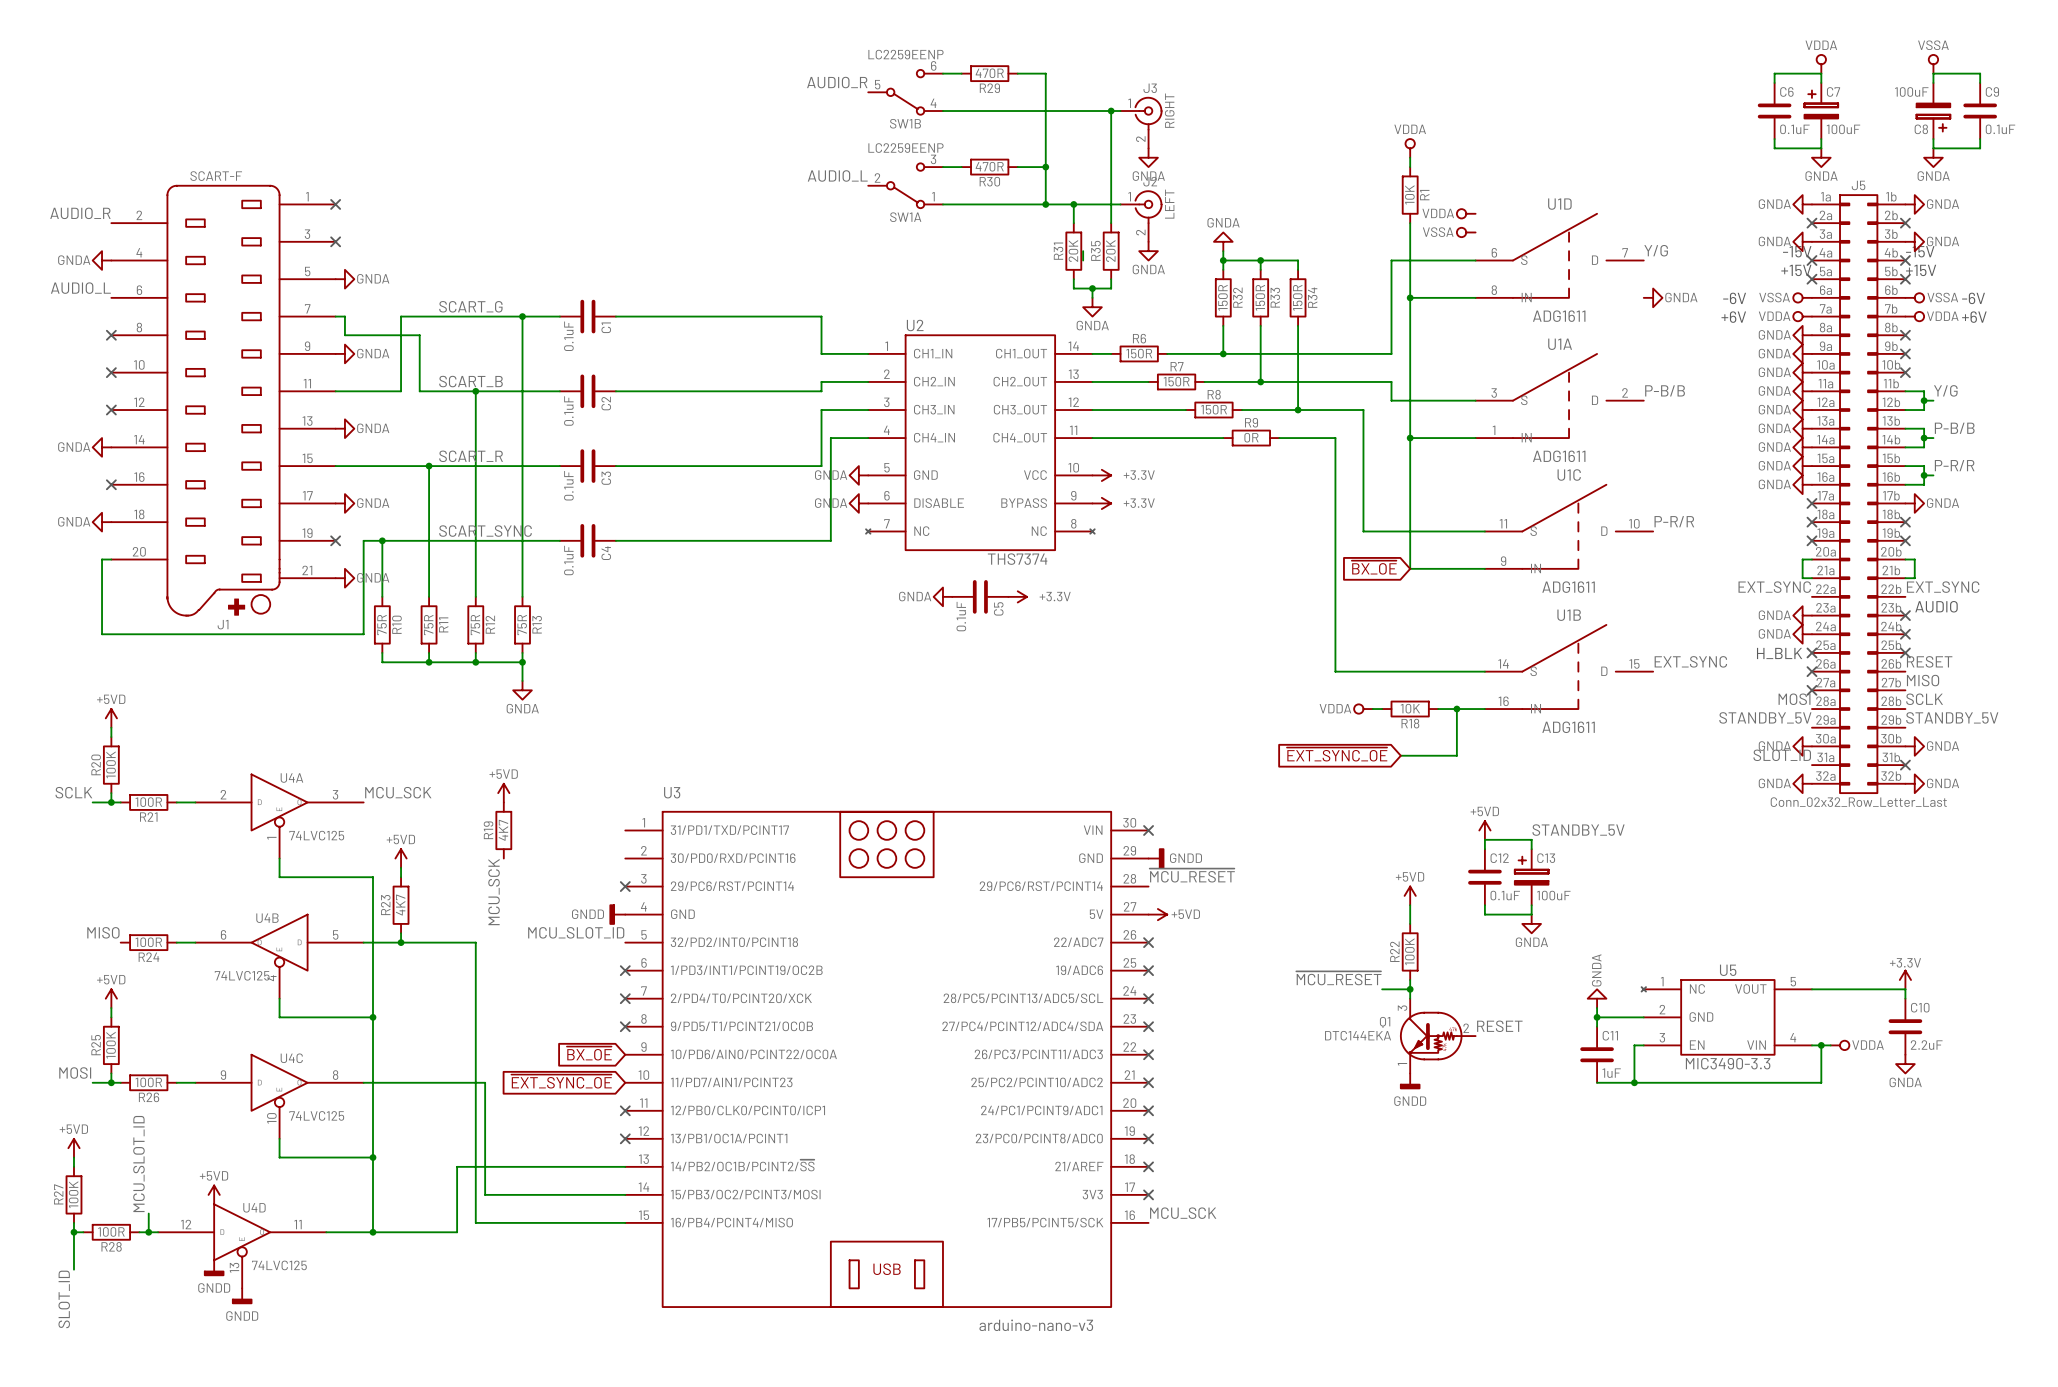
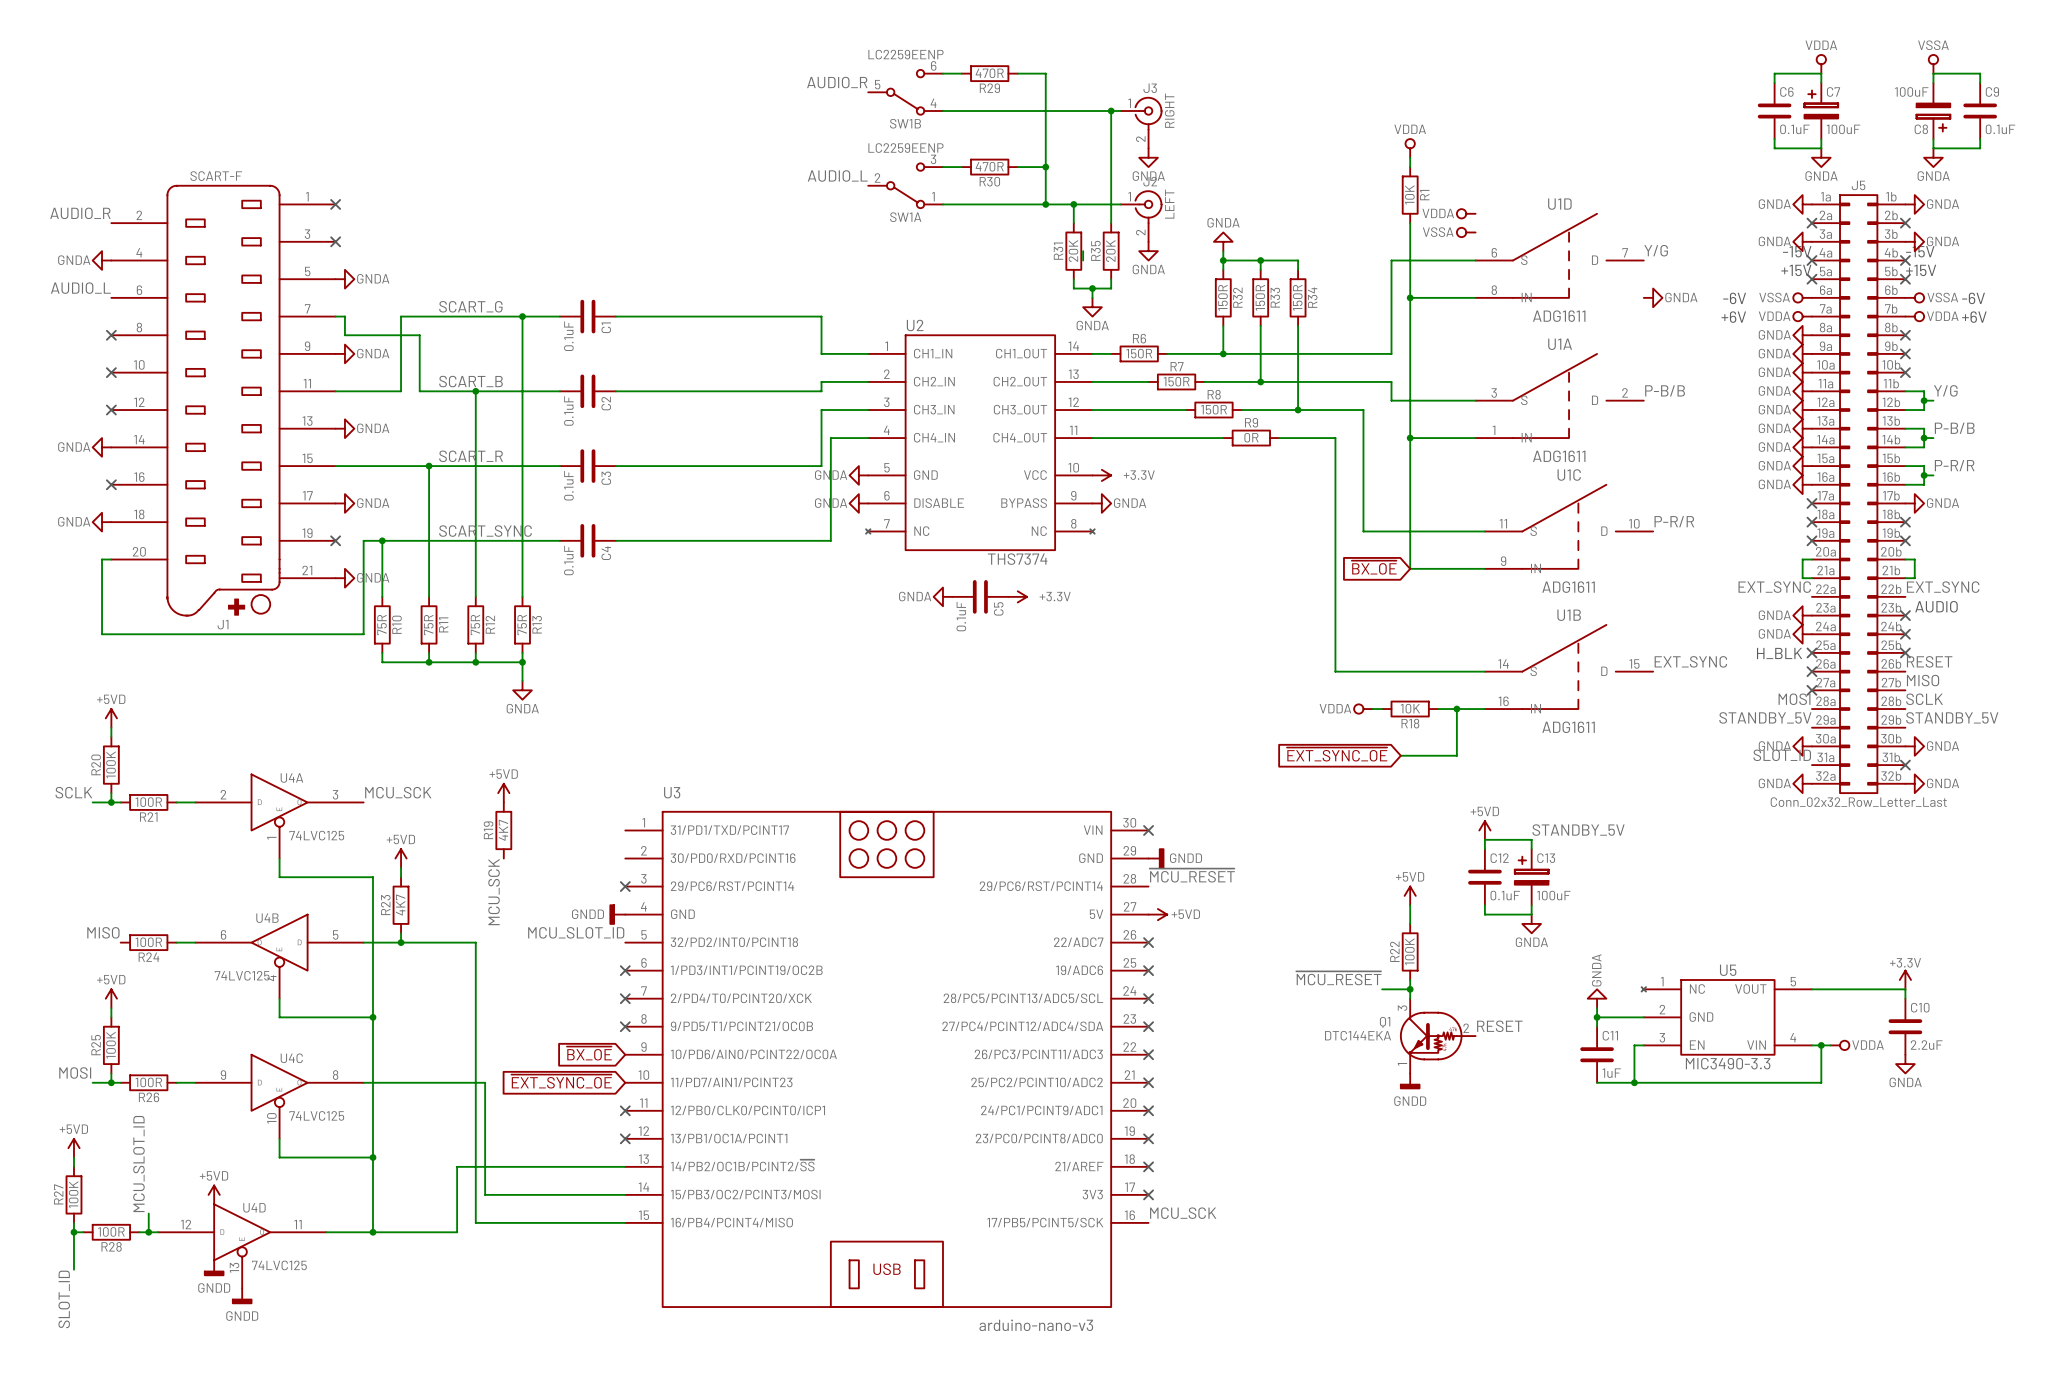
power symbol: +3.3V (1101, 503) -> GNDA (1101, 503)

